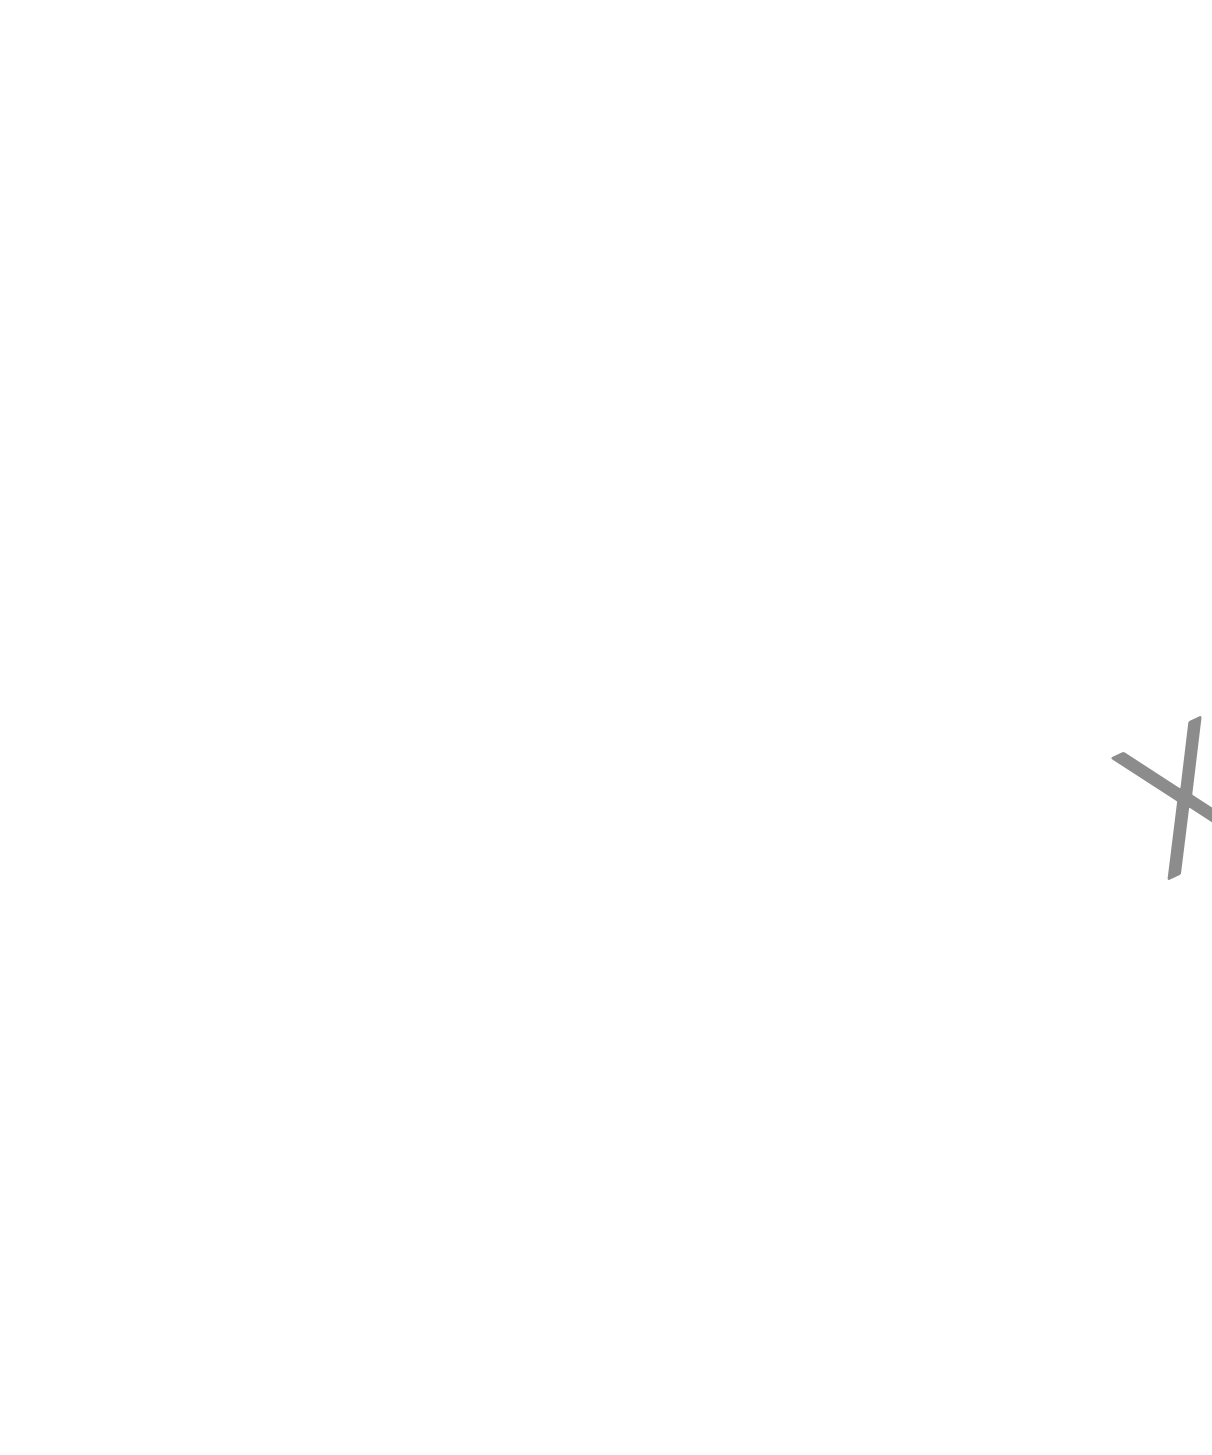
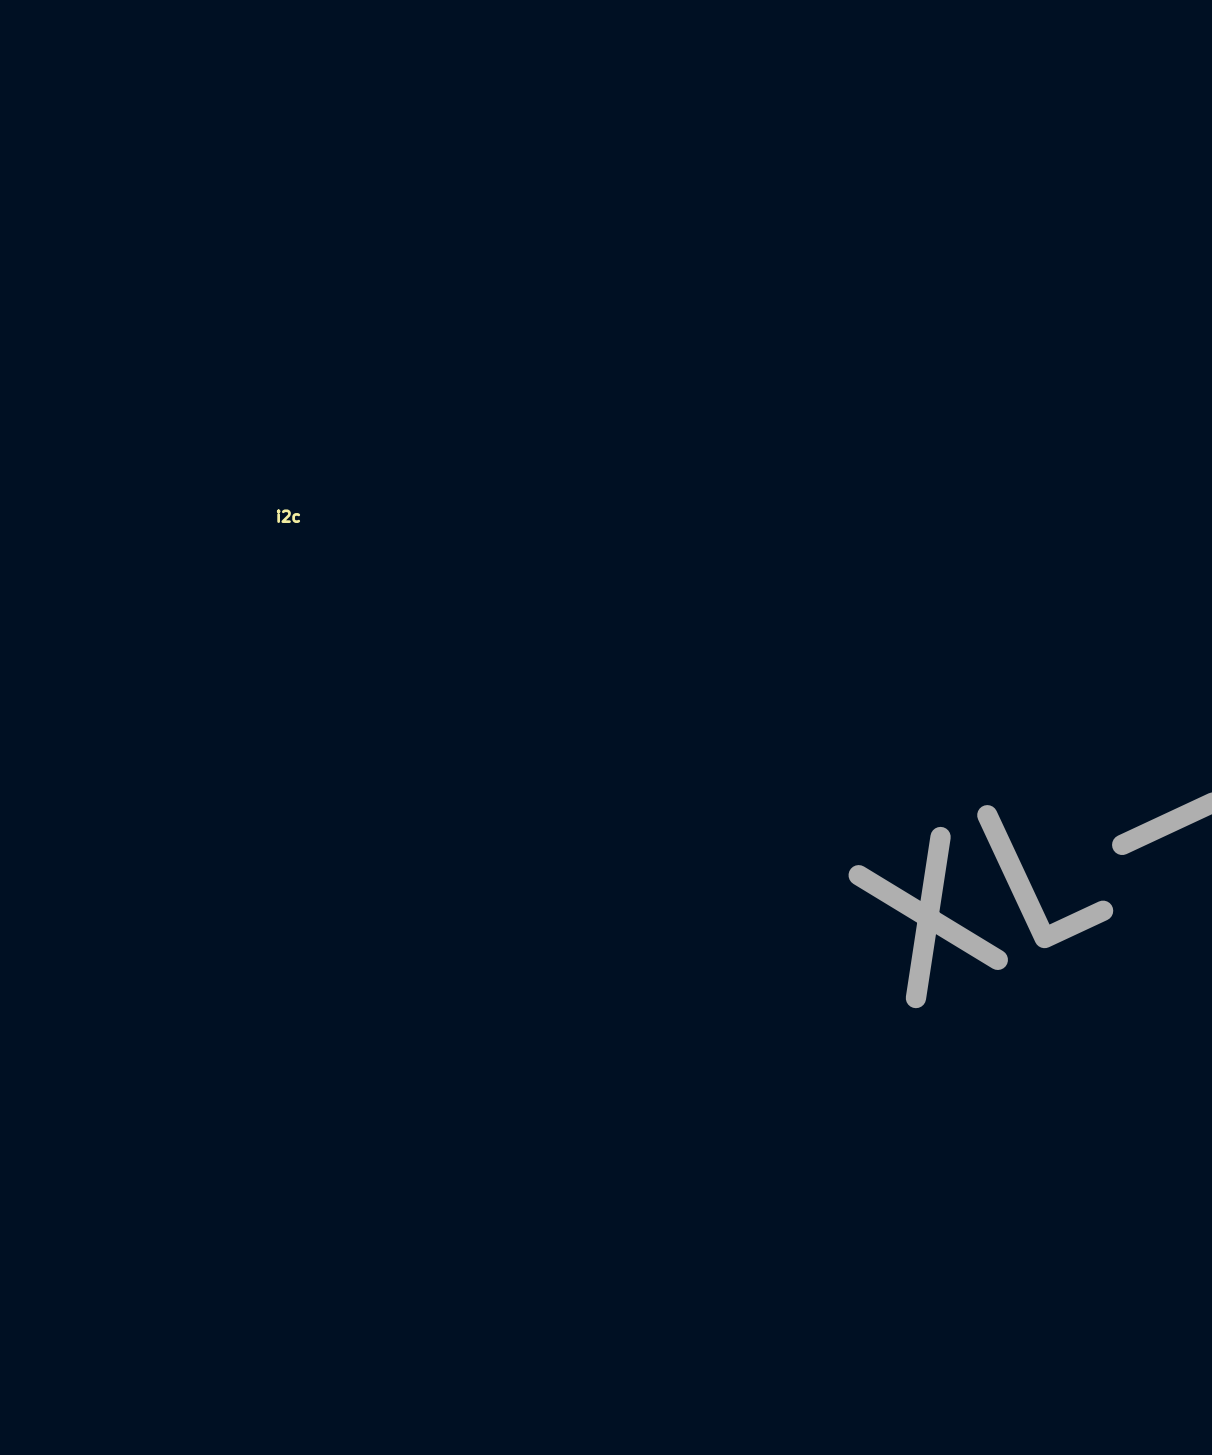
text: none -> i2c (288, 516)

